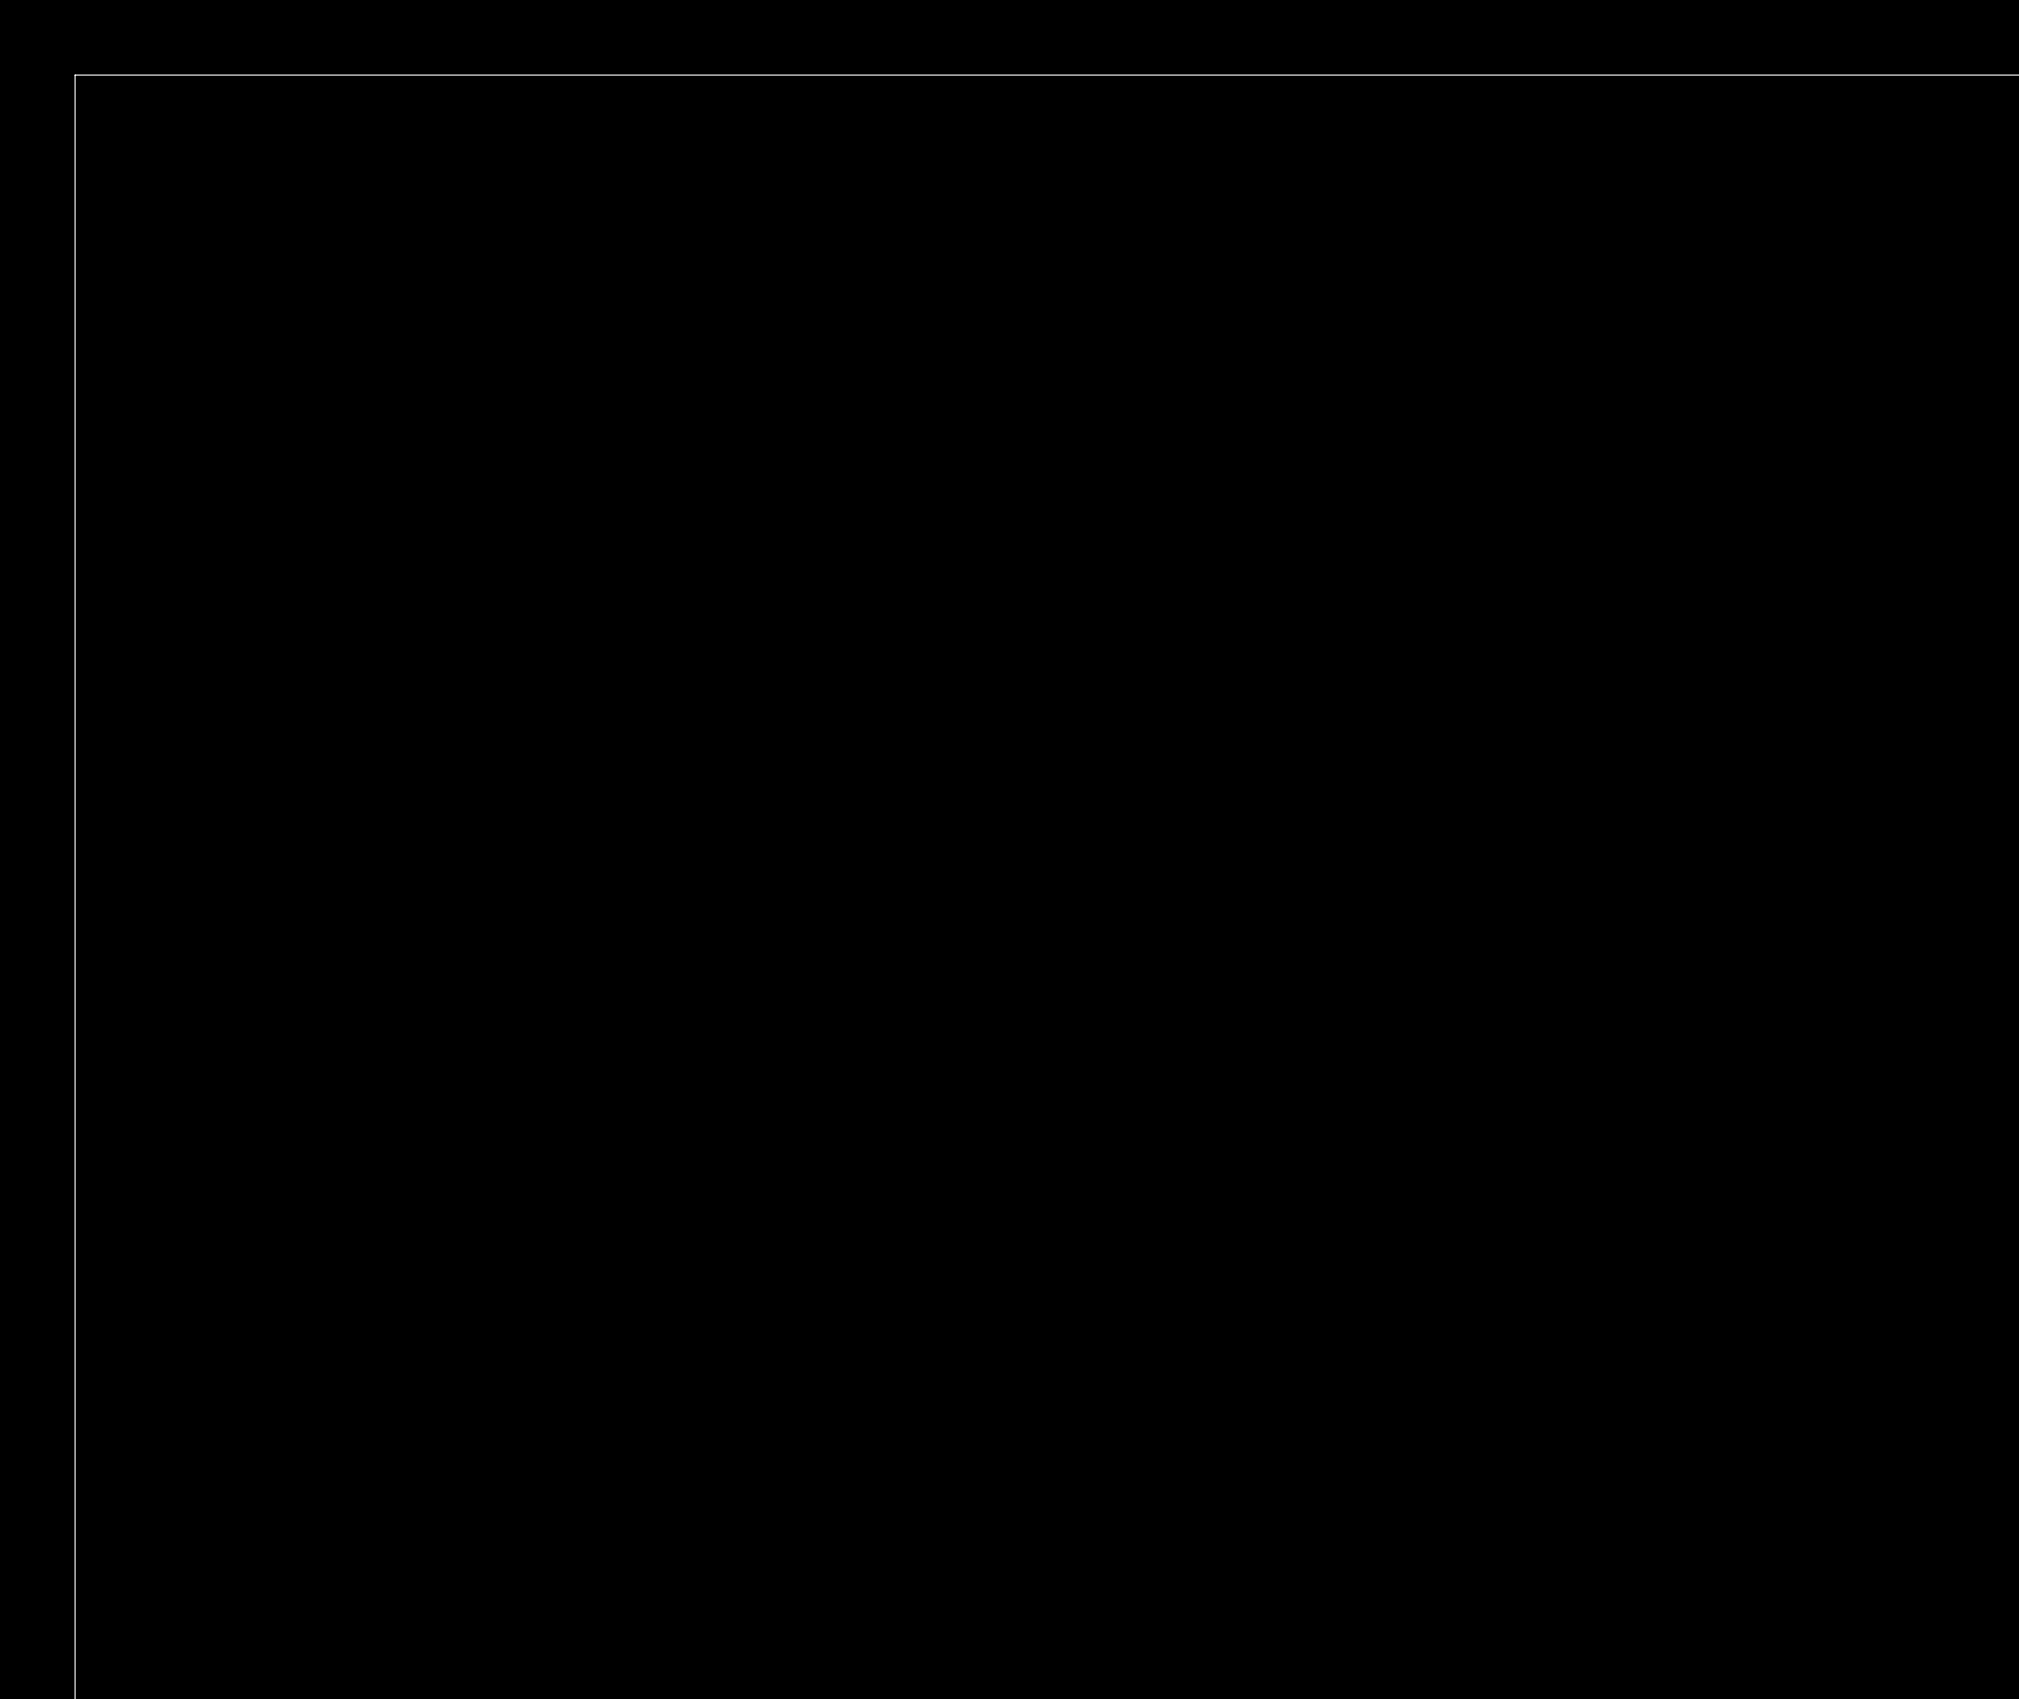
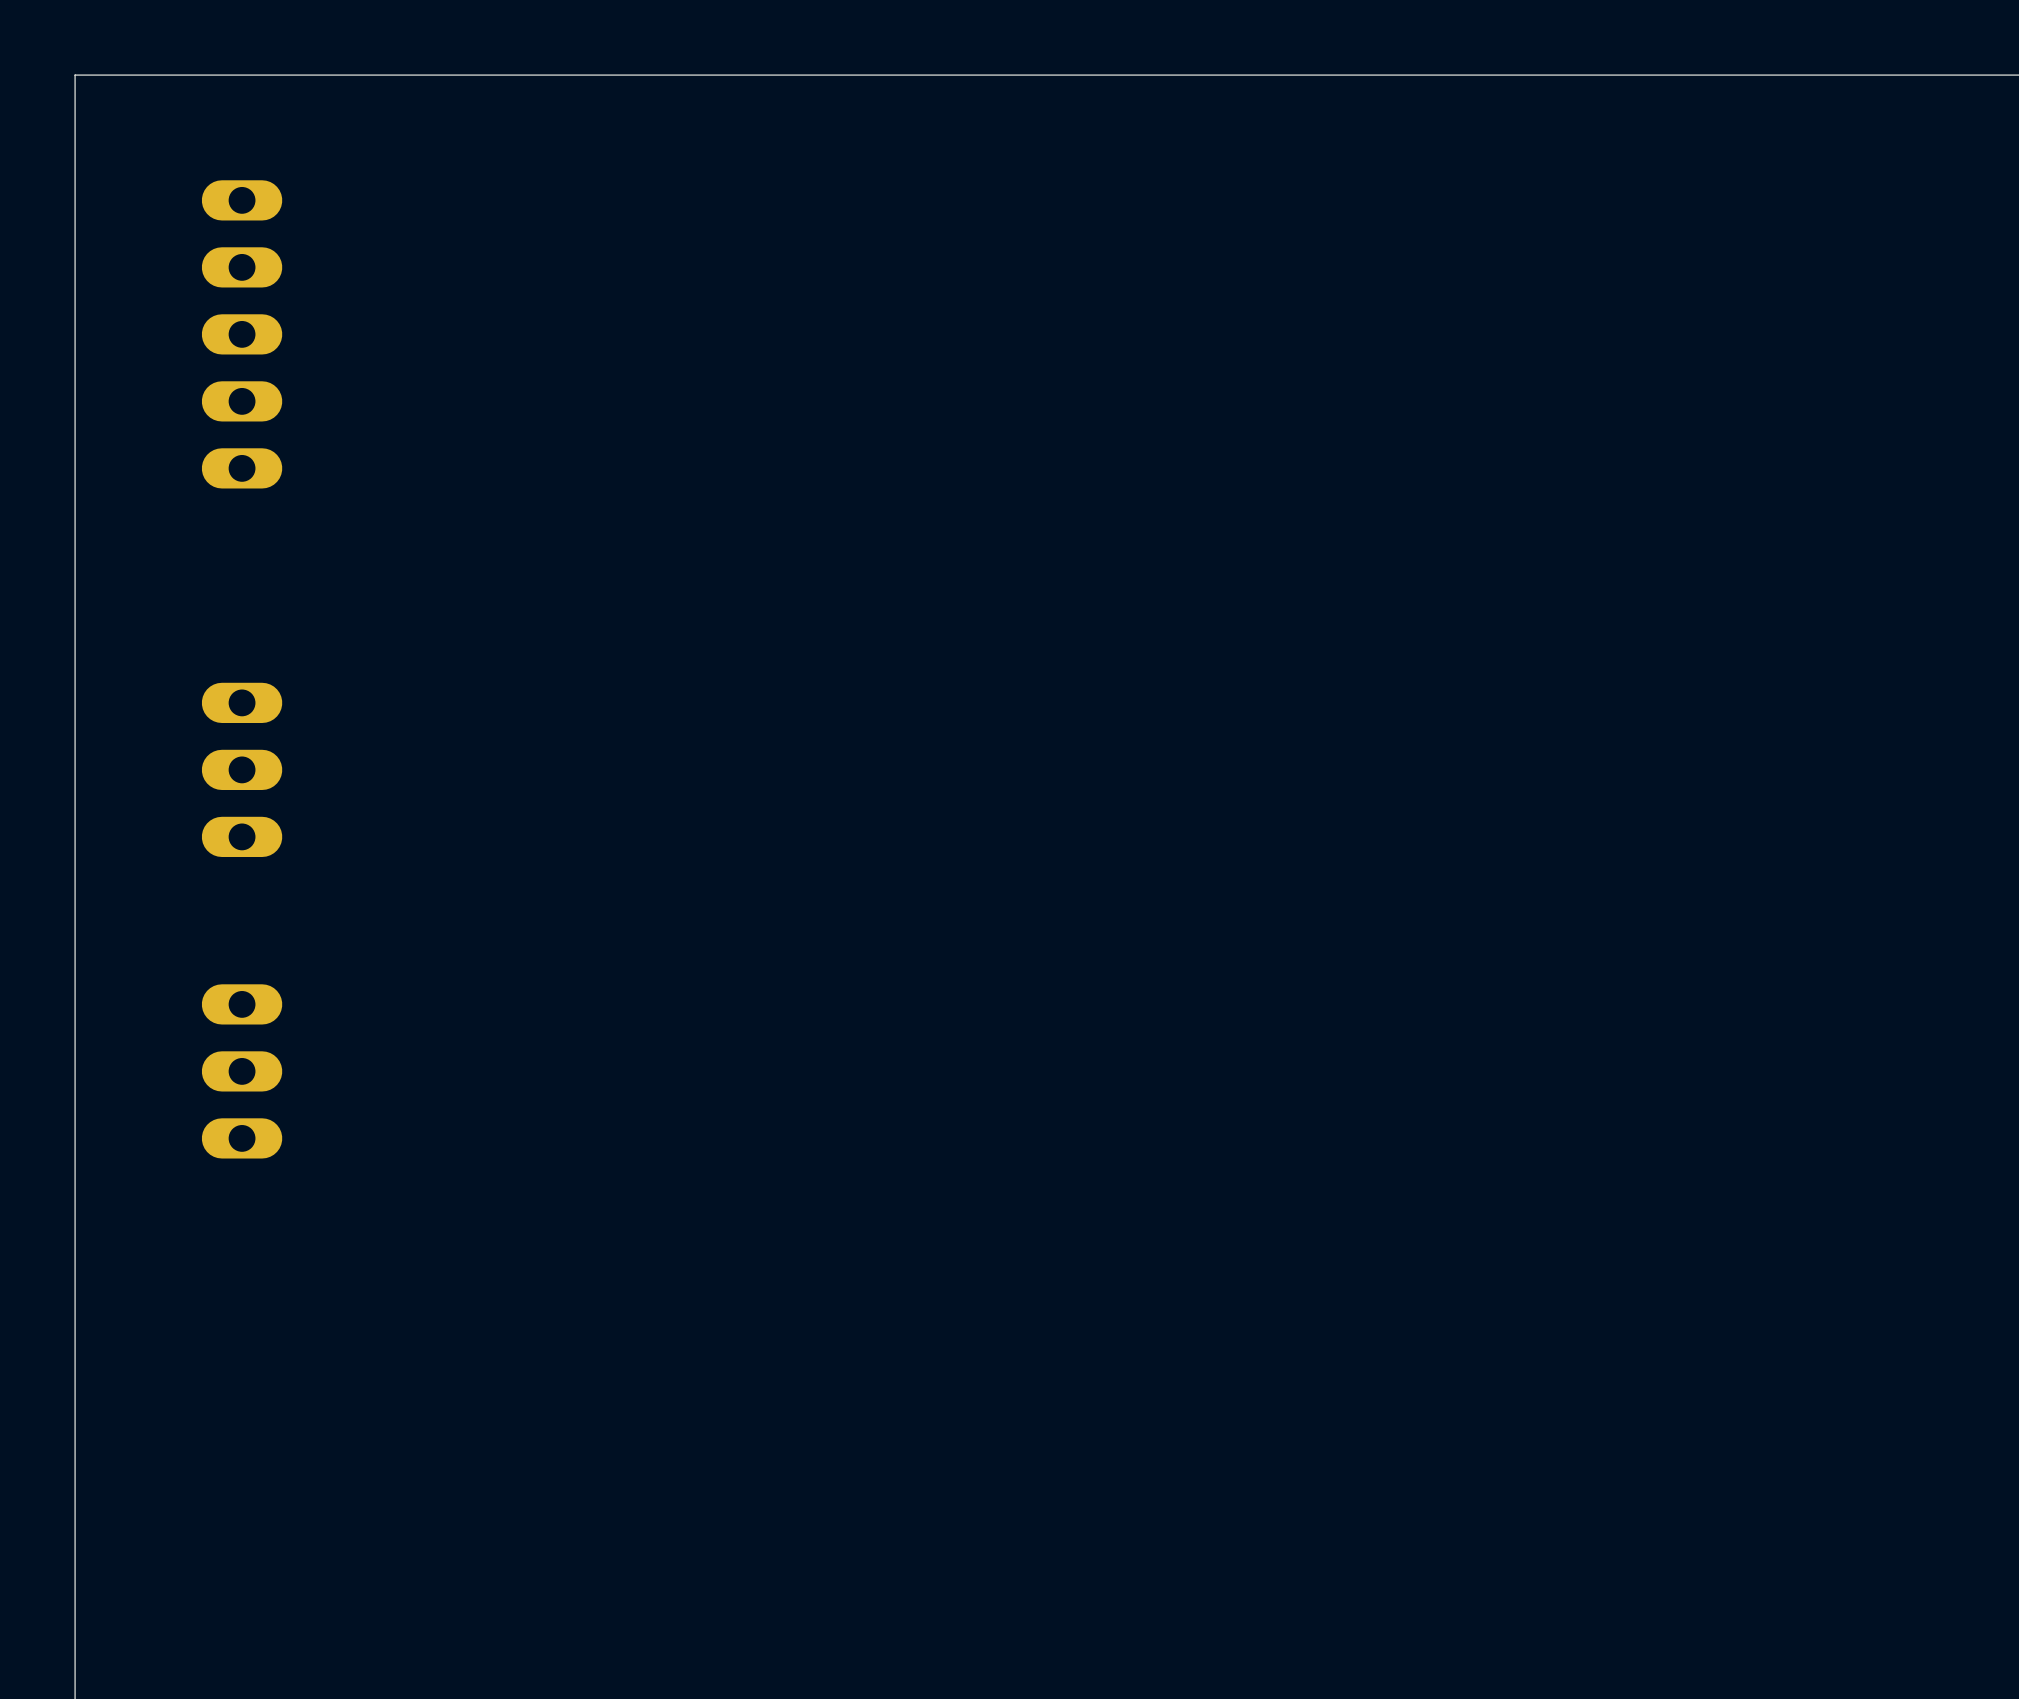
part: none -> (242, 334)
part: none -> (242, 769)
part: none -> (242, 1071)

